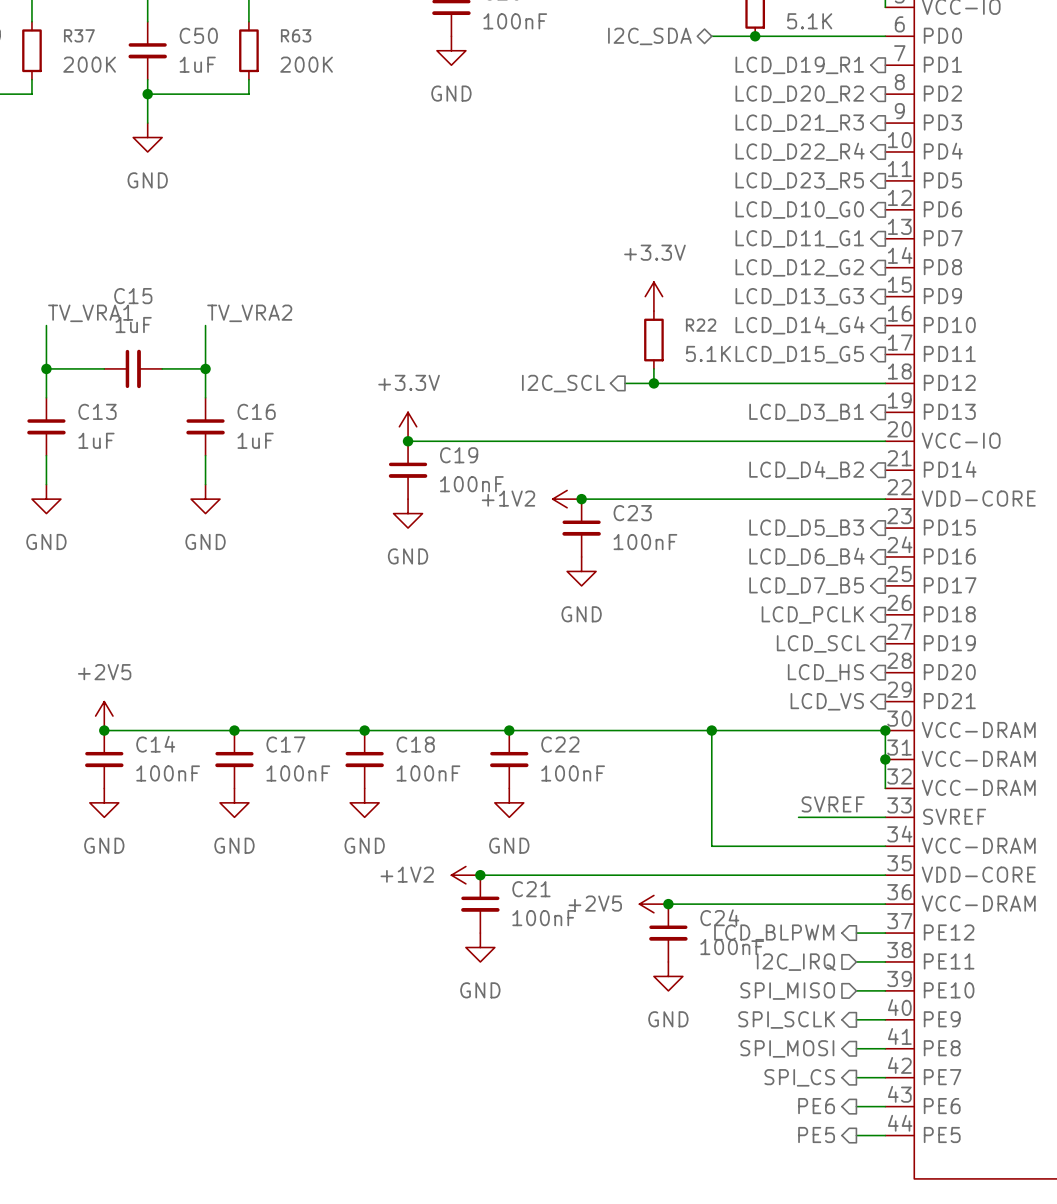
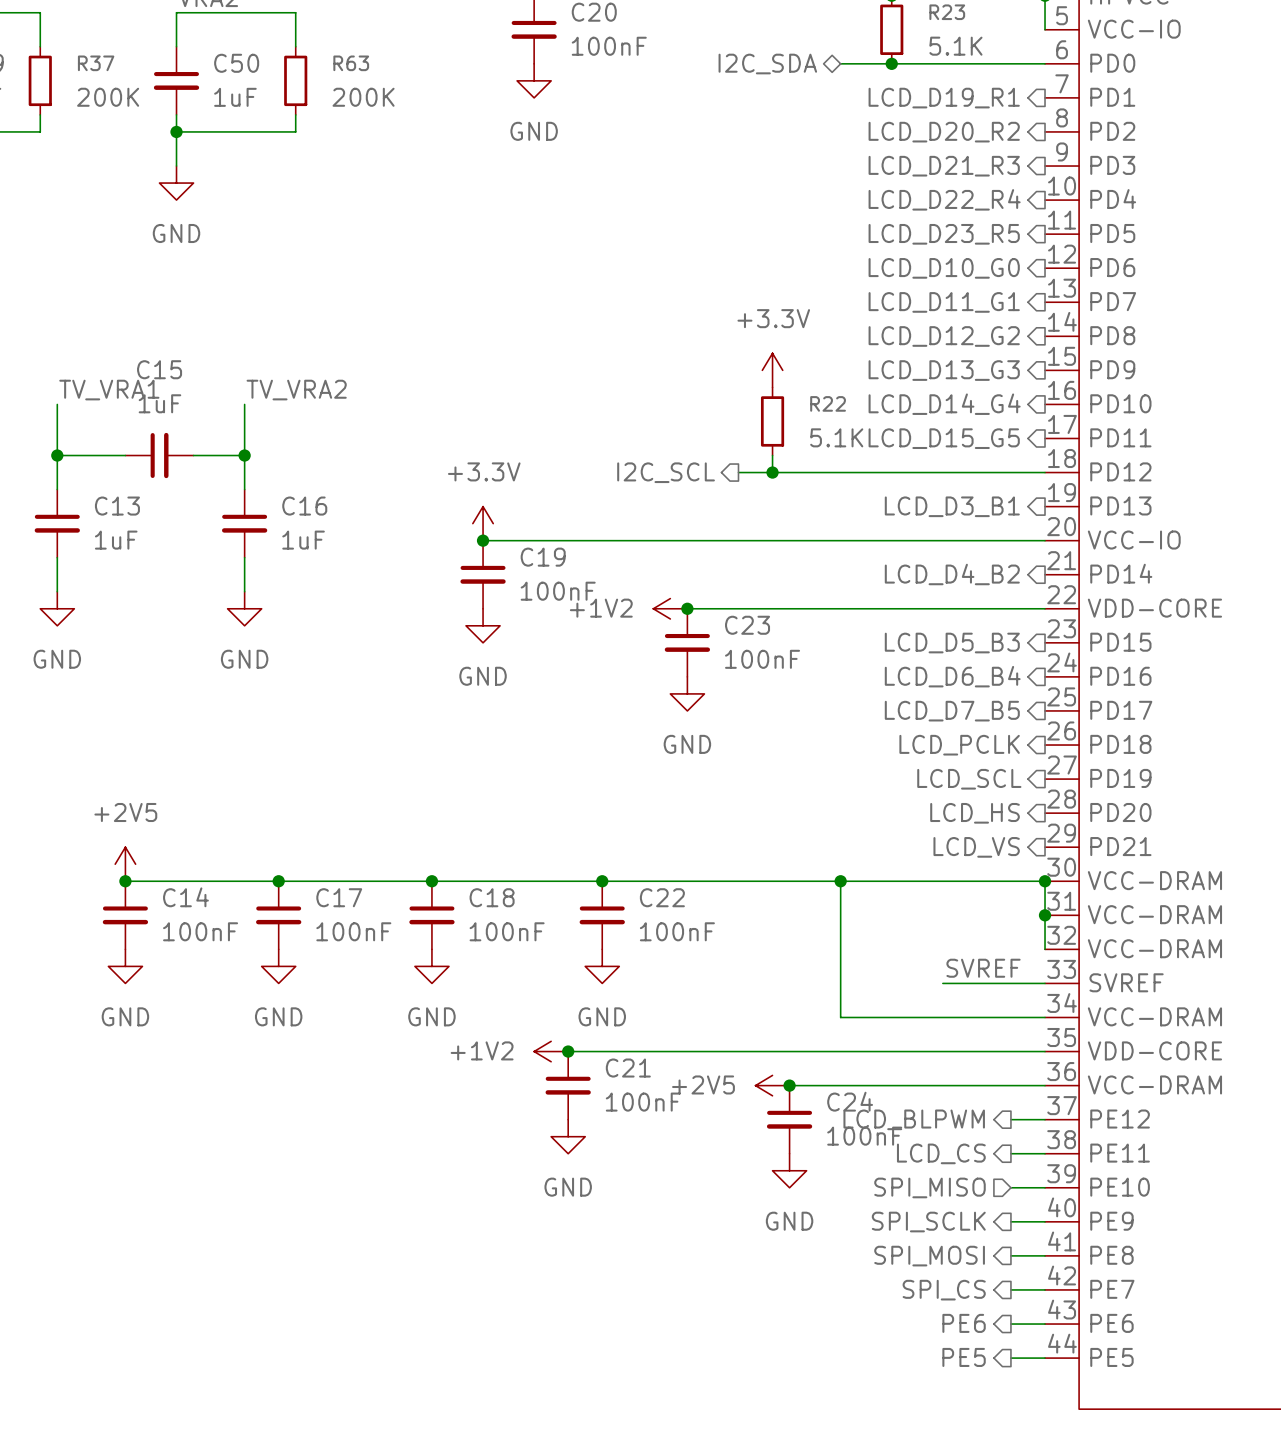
hierarchical label shape: input (796, 962) -> output (941, 1153)
hierarchical label: I2C_IRQ (796, 962) -> LCD_CS (941, 1153)

